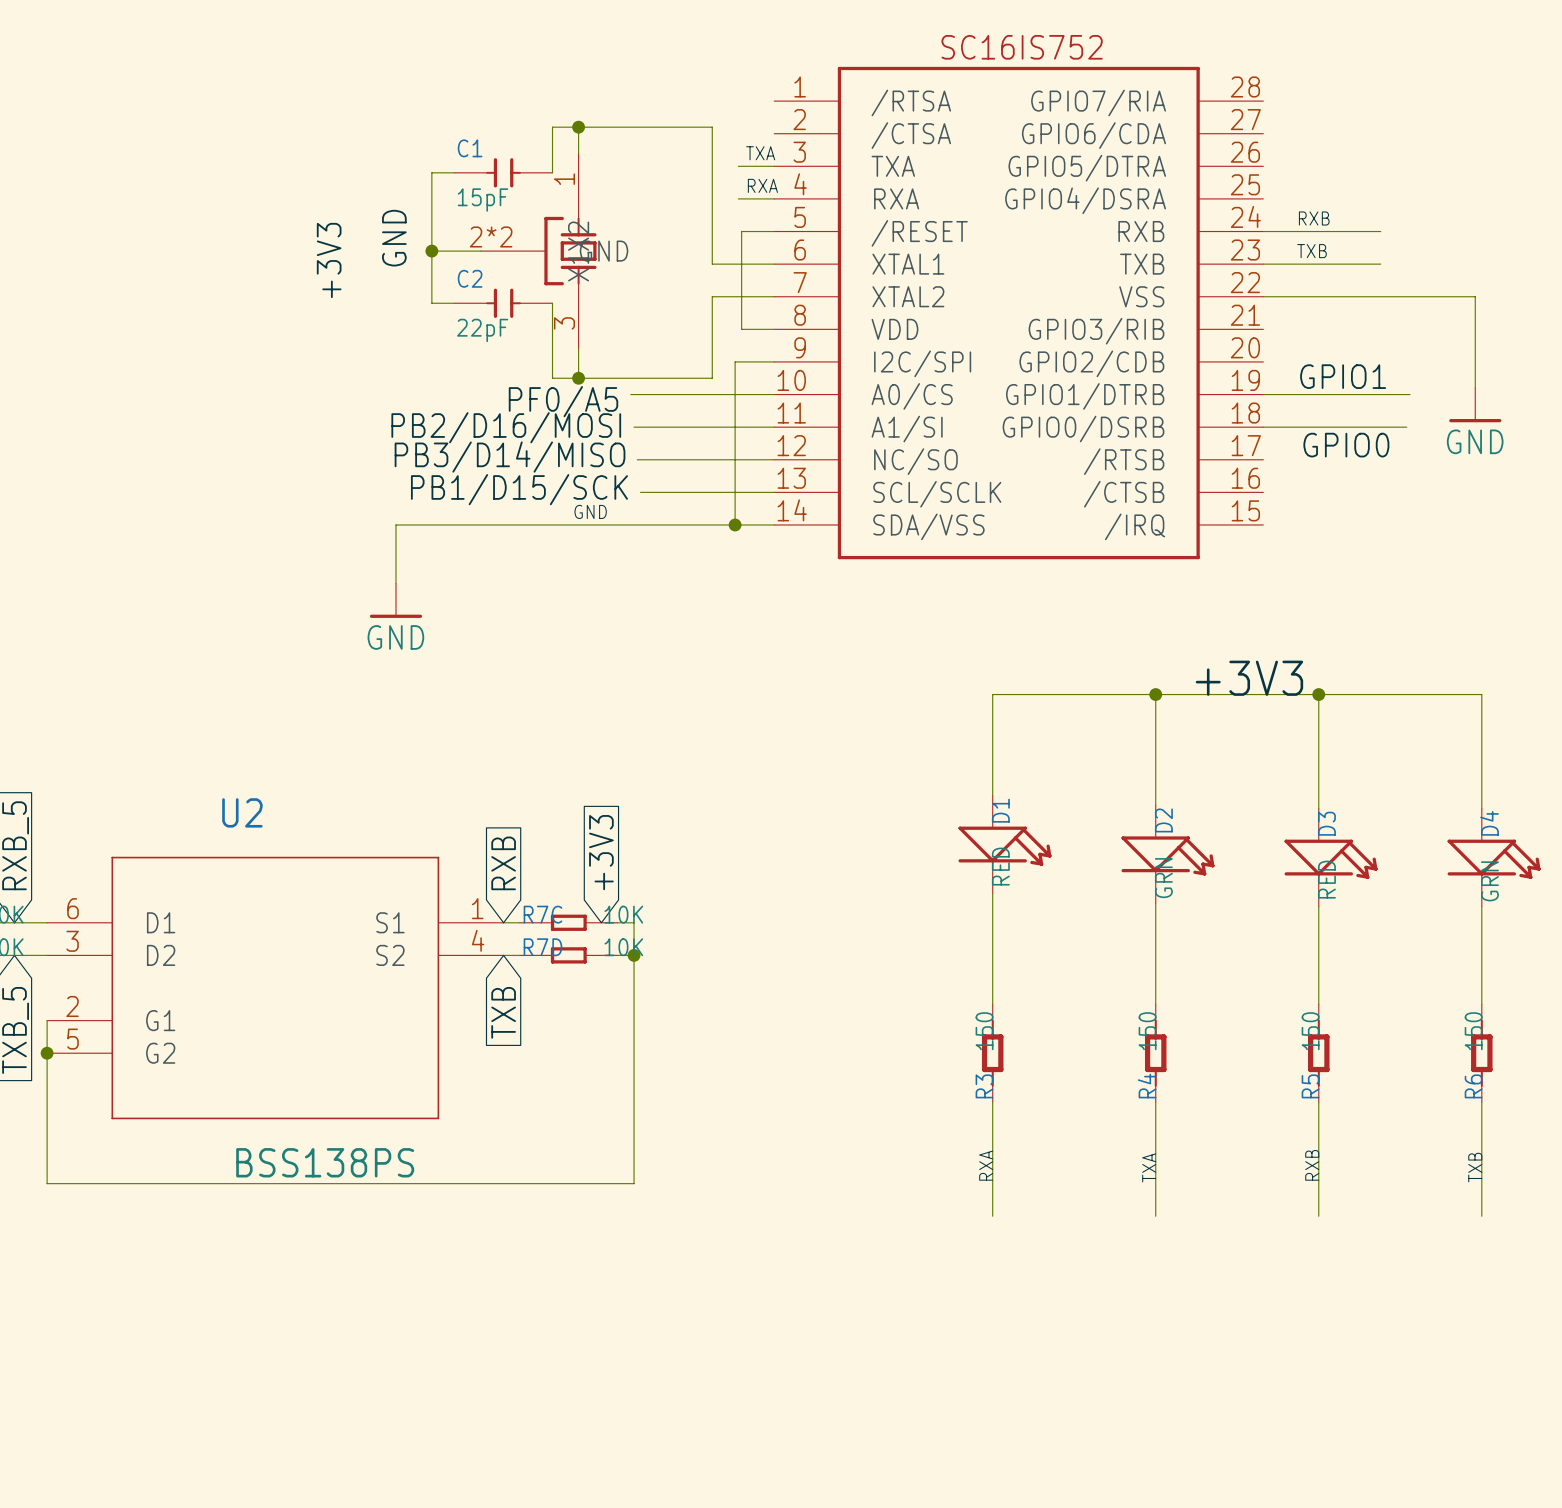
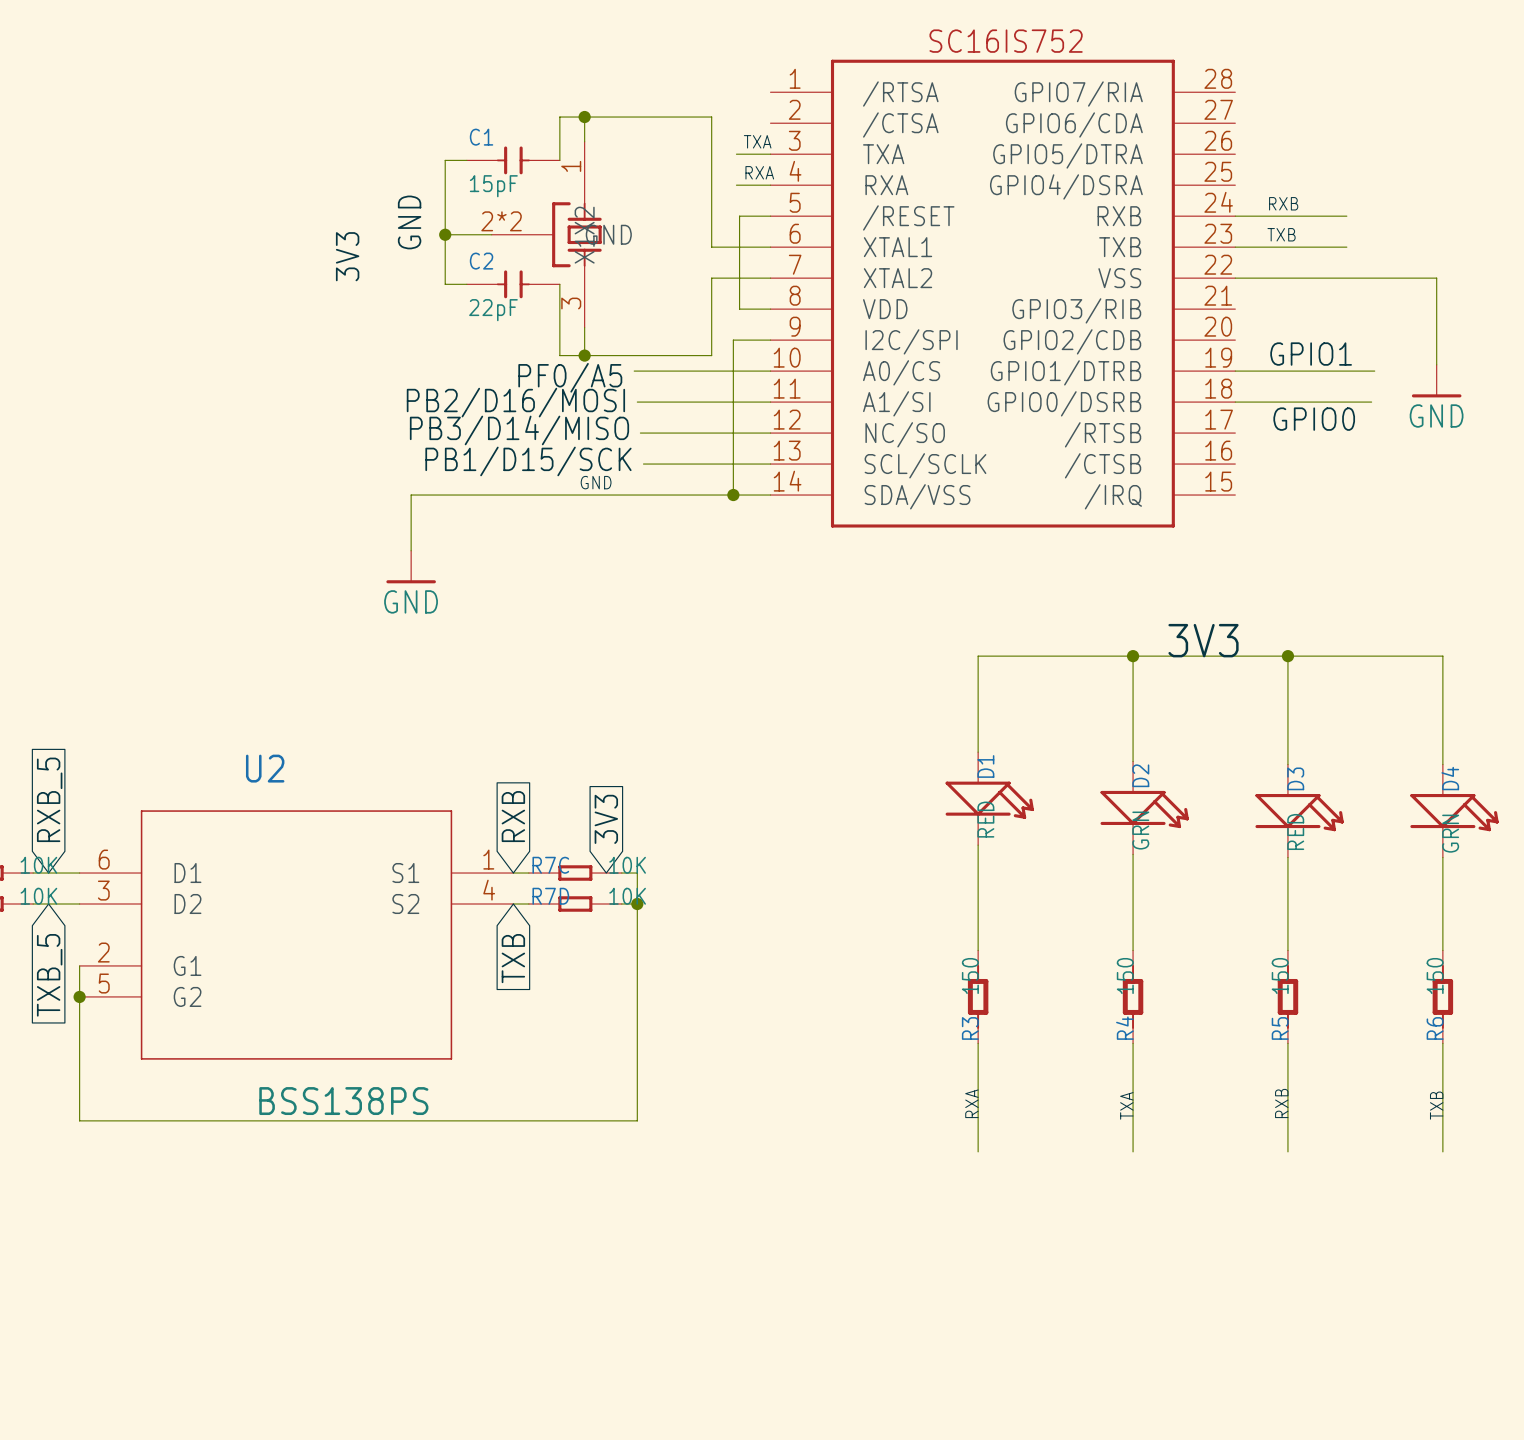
label: +3V3 (329, 260) -> 3V3 (347, 256)
label: +3V3 (1249, 678) -> 3V3 (1203, 640)
global label: +3V3 (601, 852) -> 3V3 (606, 819)

